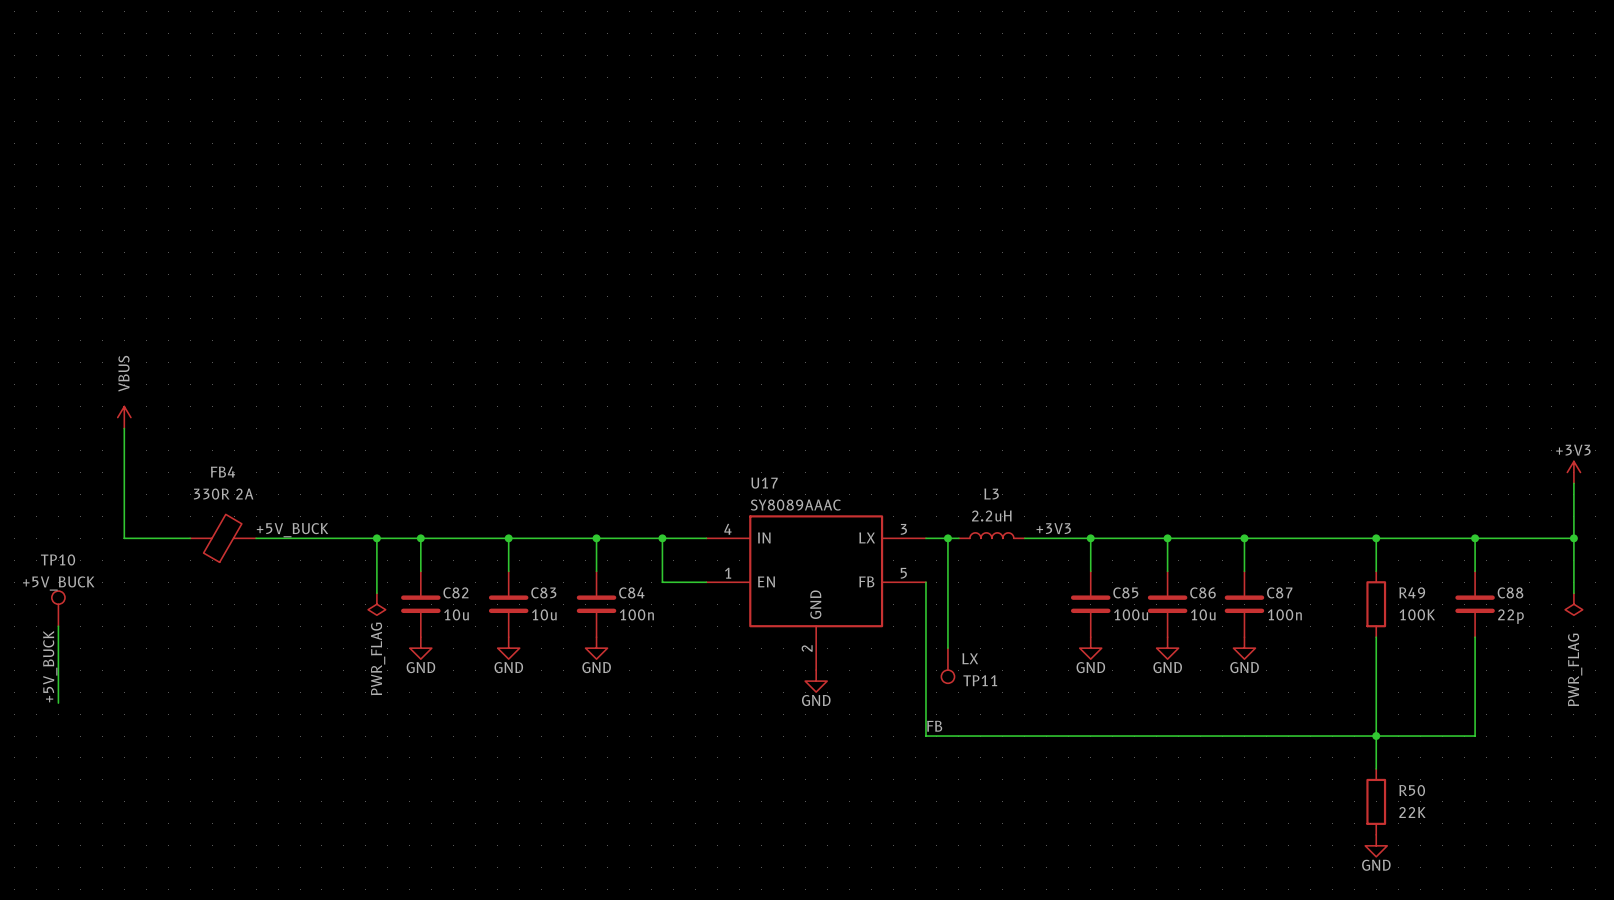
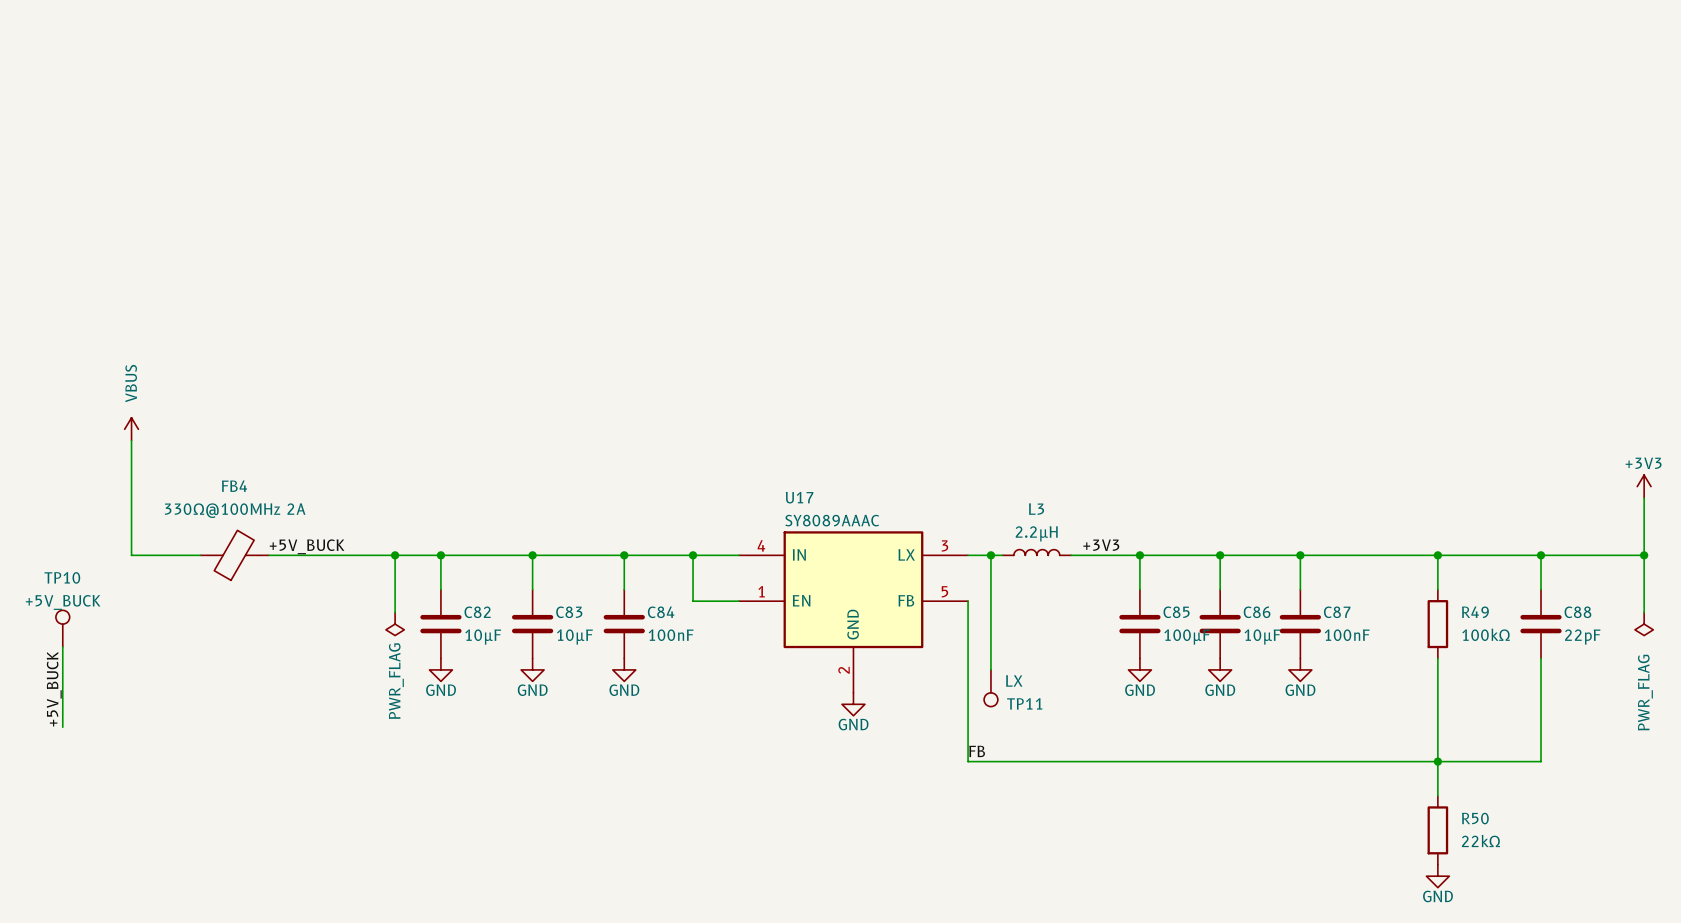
FB4 value: 330R 2A (223, 494) -> 330Ω@100MHz 2A (235, 510)
L3 value: 2.2uH (991, 516) -> 2.2µH (1036, 533)
C82 value: 10u (456, 614) -> 10µF (483, 637)
C83 value: 10u (544, 614) -> 10µF (574, 637)
C84 value: 100n (636, 614) -> 100nF (671, 635)
C85 value: 100u (1131, 614) -> 100µF (1187, 637)
C86 value: 10u (1203, 614) -> 10µF (1262, 637)
C87 value: 100n (1284, 614) -> 100nF (1347, 635)
R49 value: 100K (1417, 614) -> 100kΩ (1486, 634)
C88 value: 22p (1510, 616) -> 22pF (1582, 637)
R50 value: 22K (1412, 812) -> 22kΩ (1480, 841)

